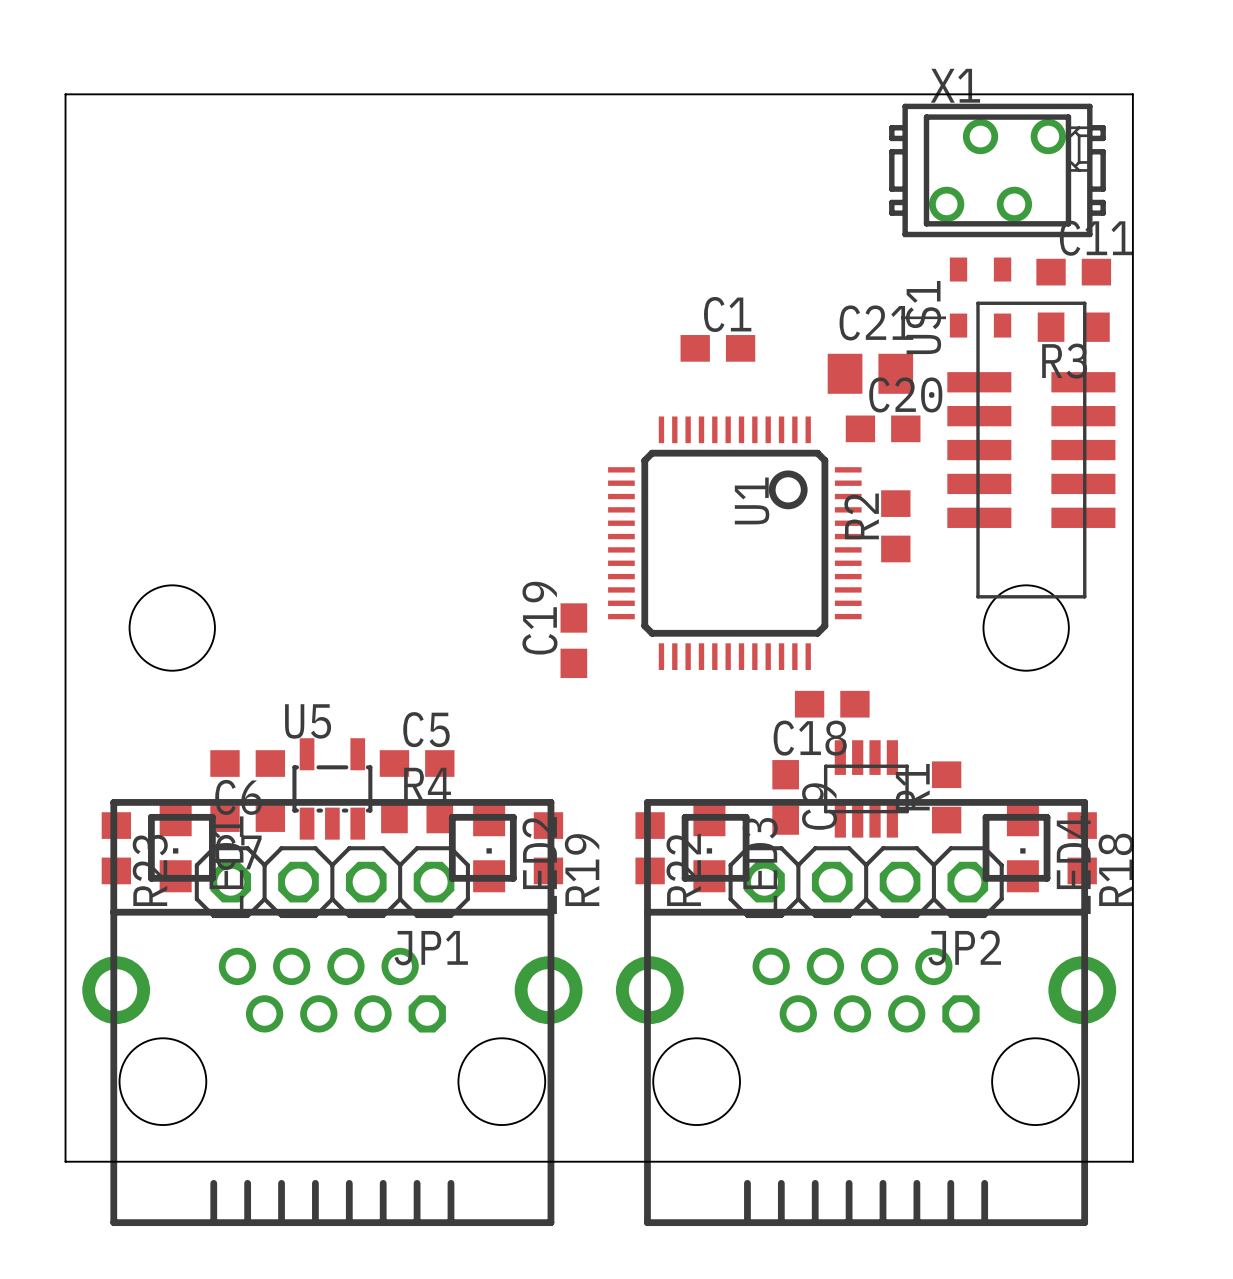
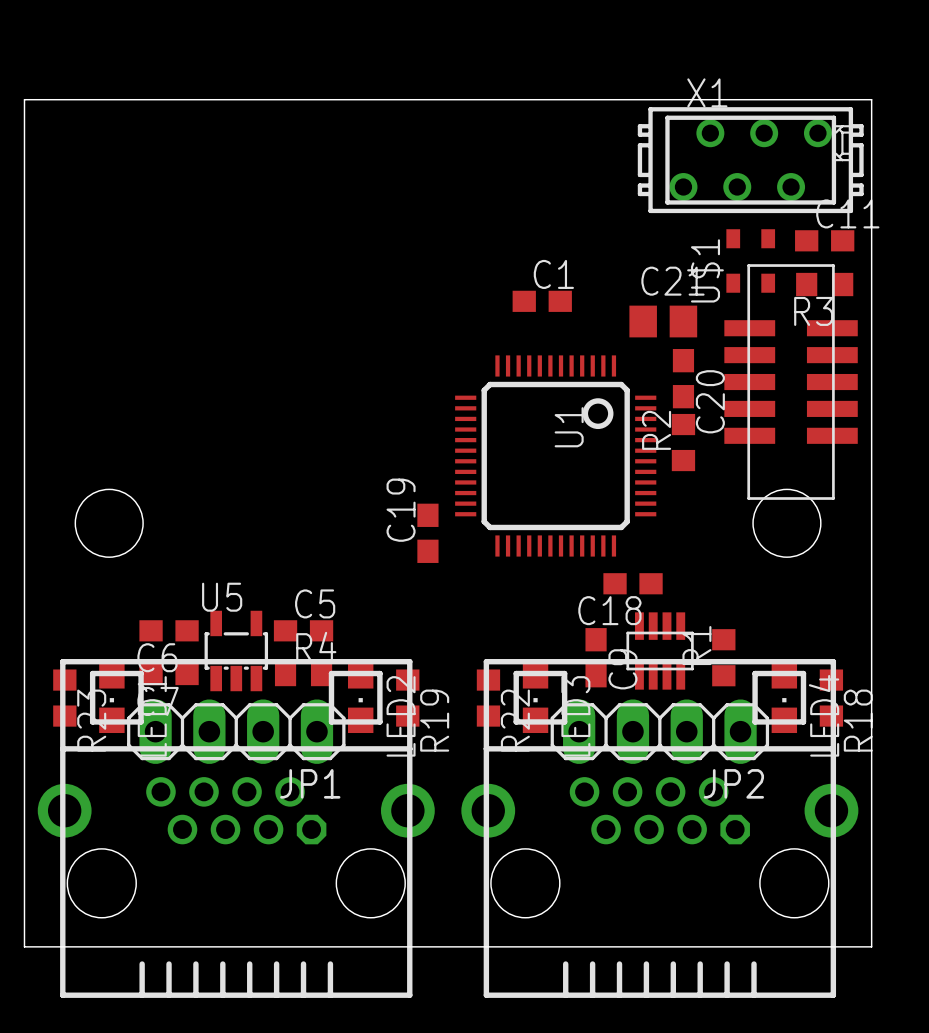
X1 footprint: [889, 103, 1106, 238] -> [637, 107, 864, 214]
C20 rotation: 0° (883, 428) -> 90° clockwise (683, 378)
JP1 footprint: [194, 846, 470, 919] -> [127, 699, 346, 764]
JP2 footprint: [728, 846, 1004, 919] -> [550, 699, 770, 764]

